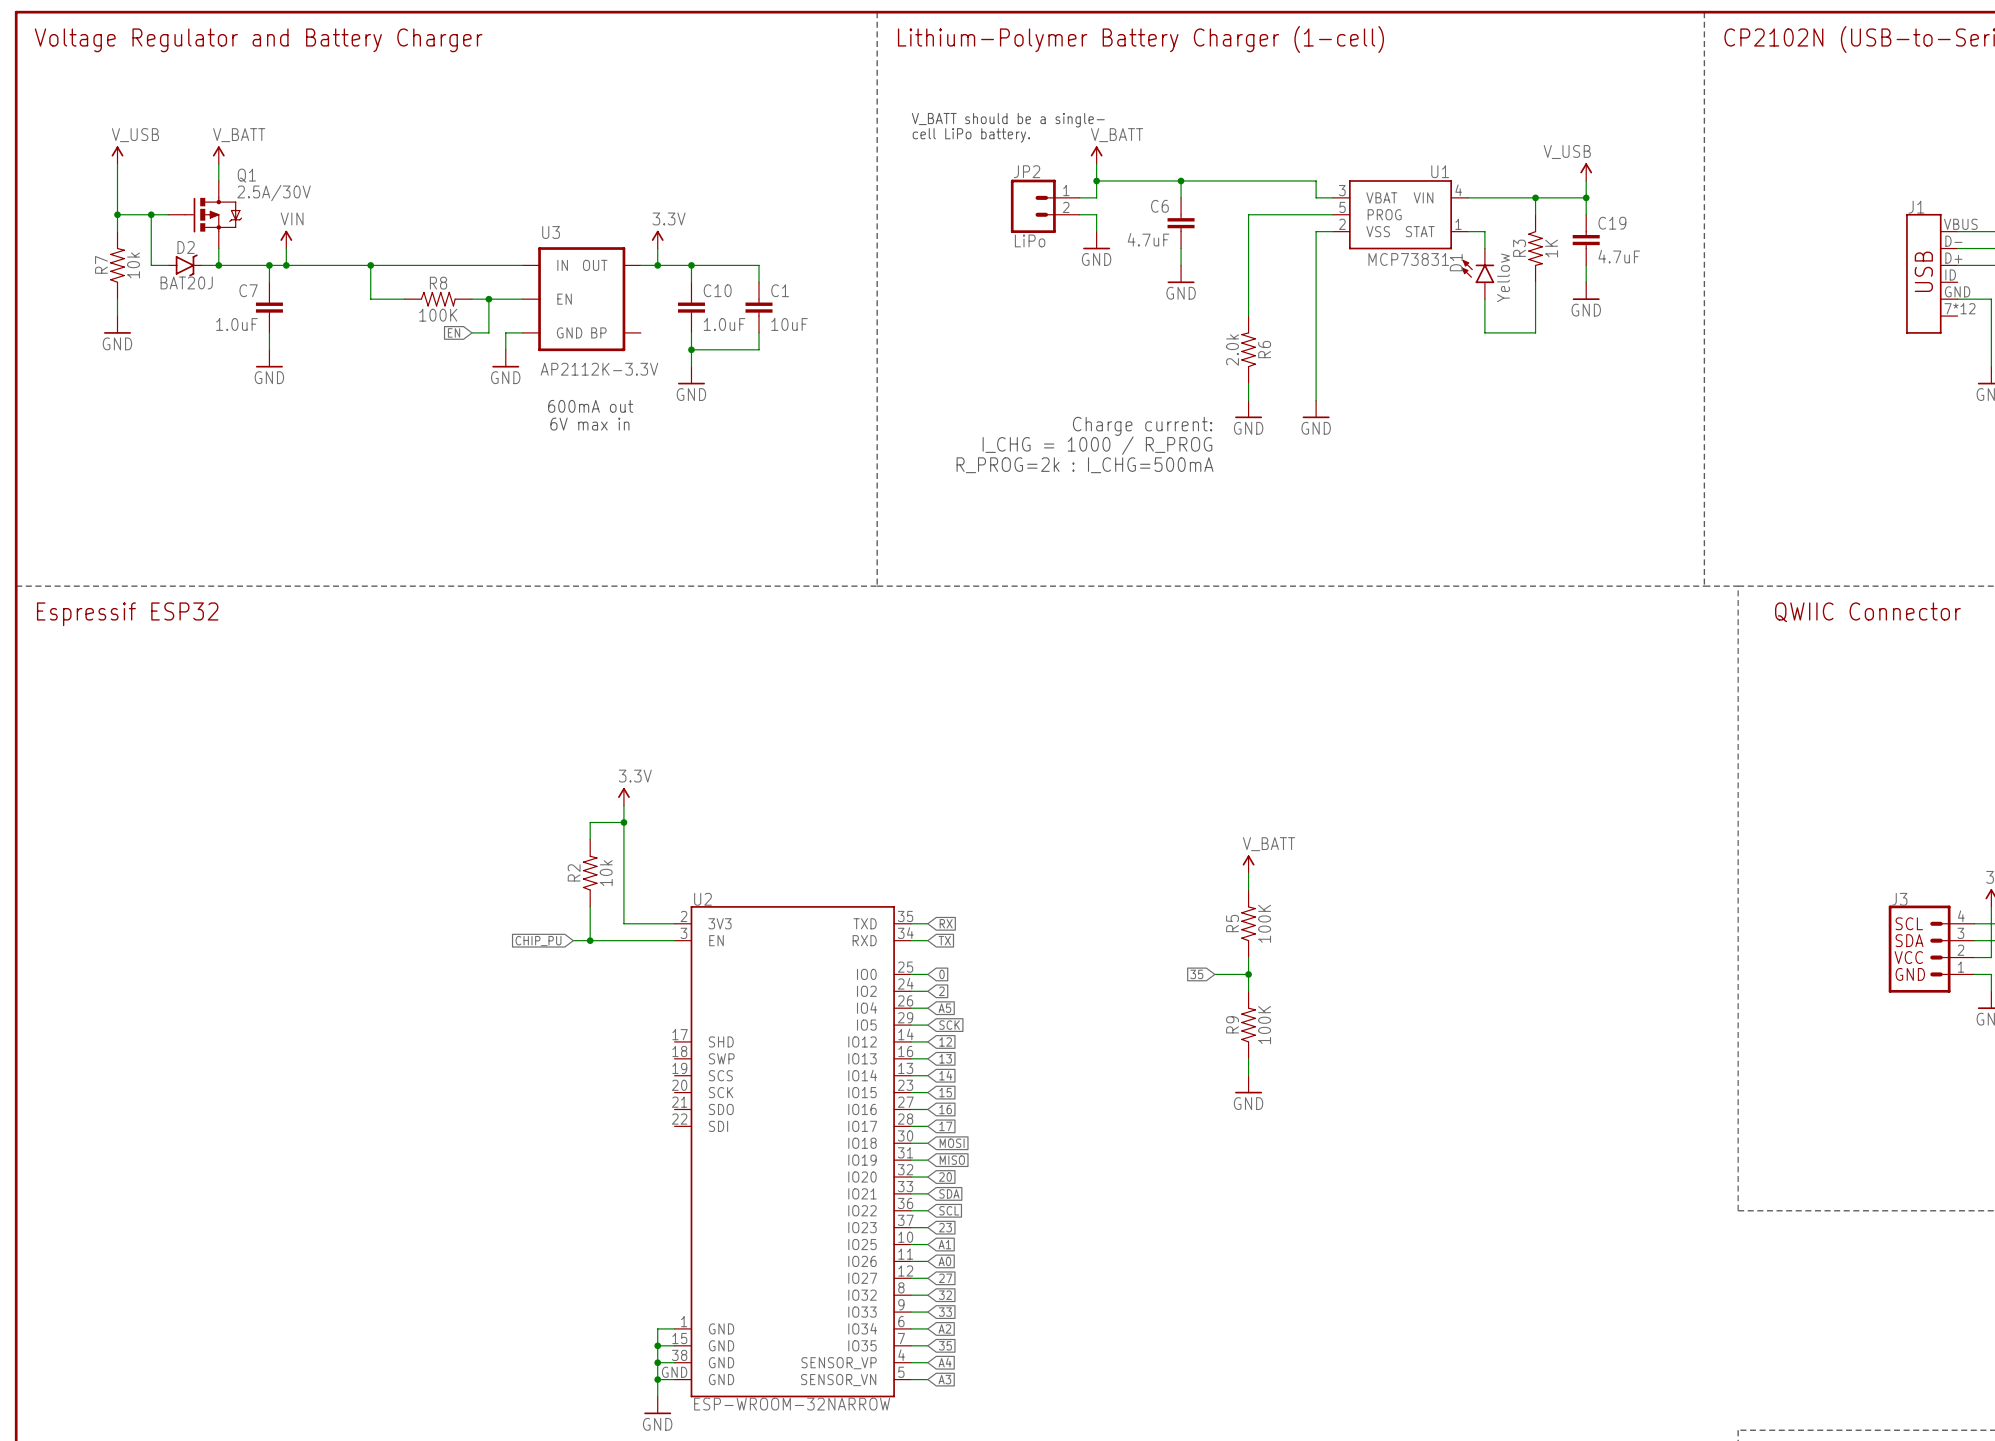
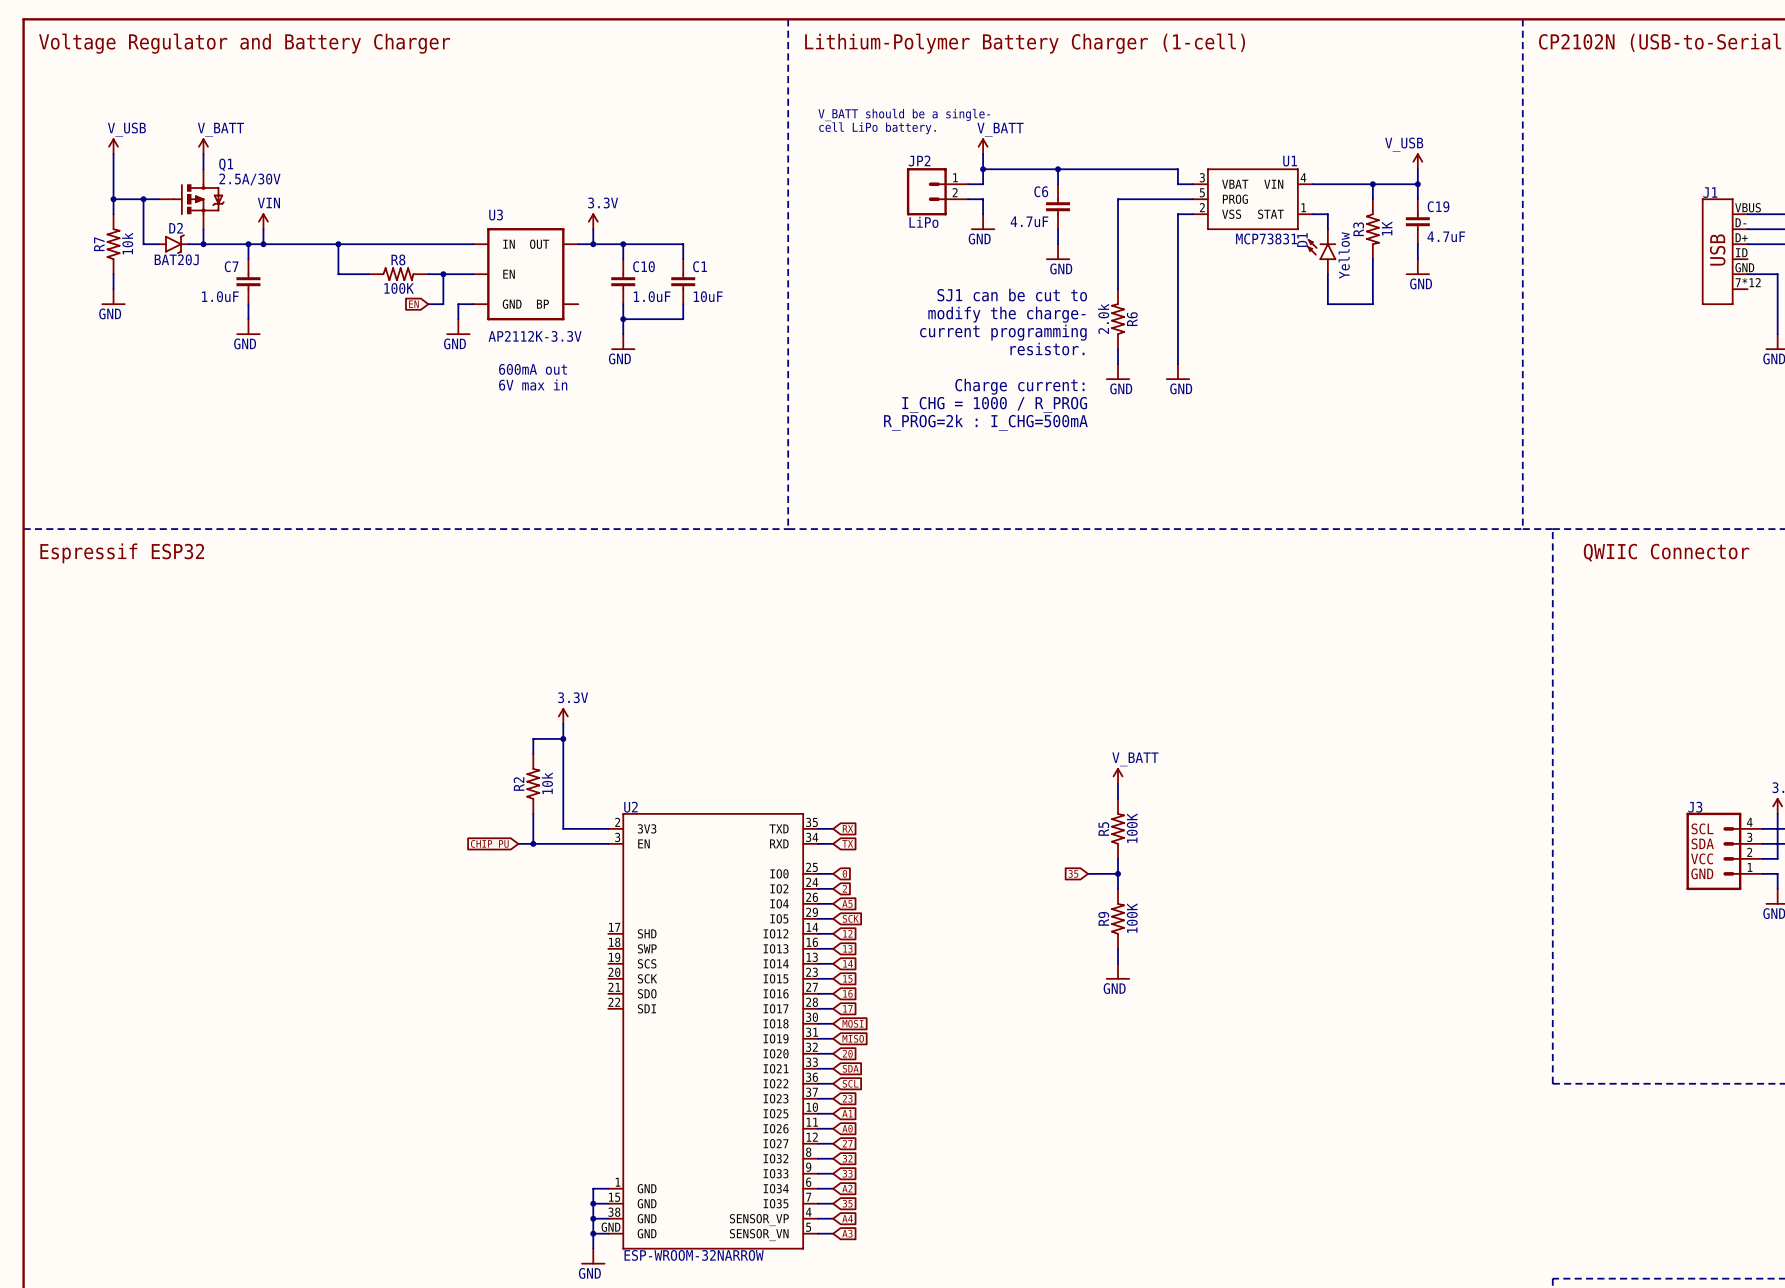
text: none -> SJ1 can be cut to (1012, 295)
text: none -> modify the charge- (1006, 314)
text: none -> current programming (1003, 332)
text: none -> resistor. (1047, 349)

